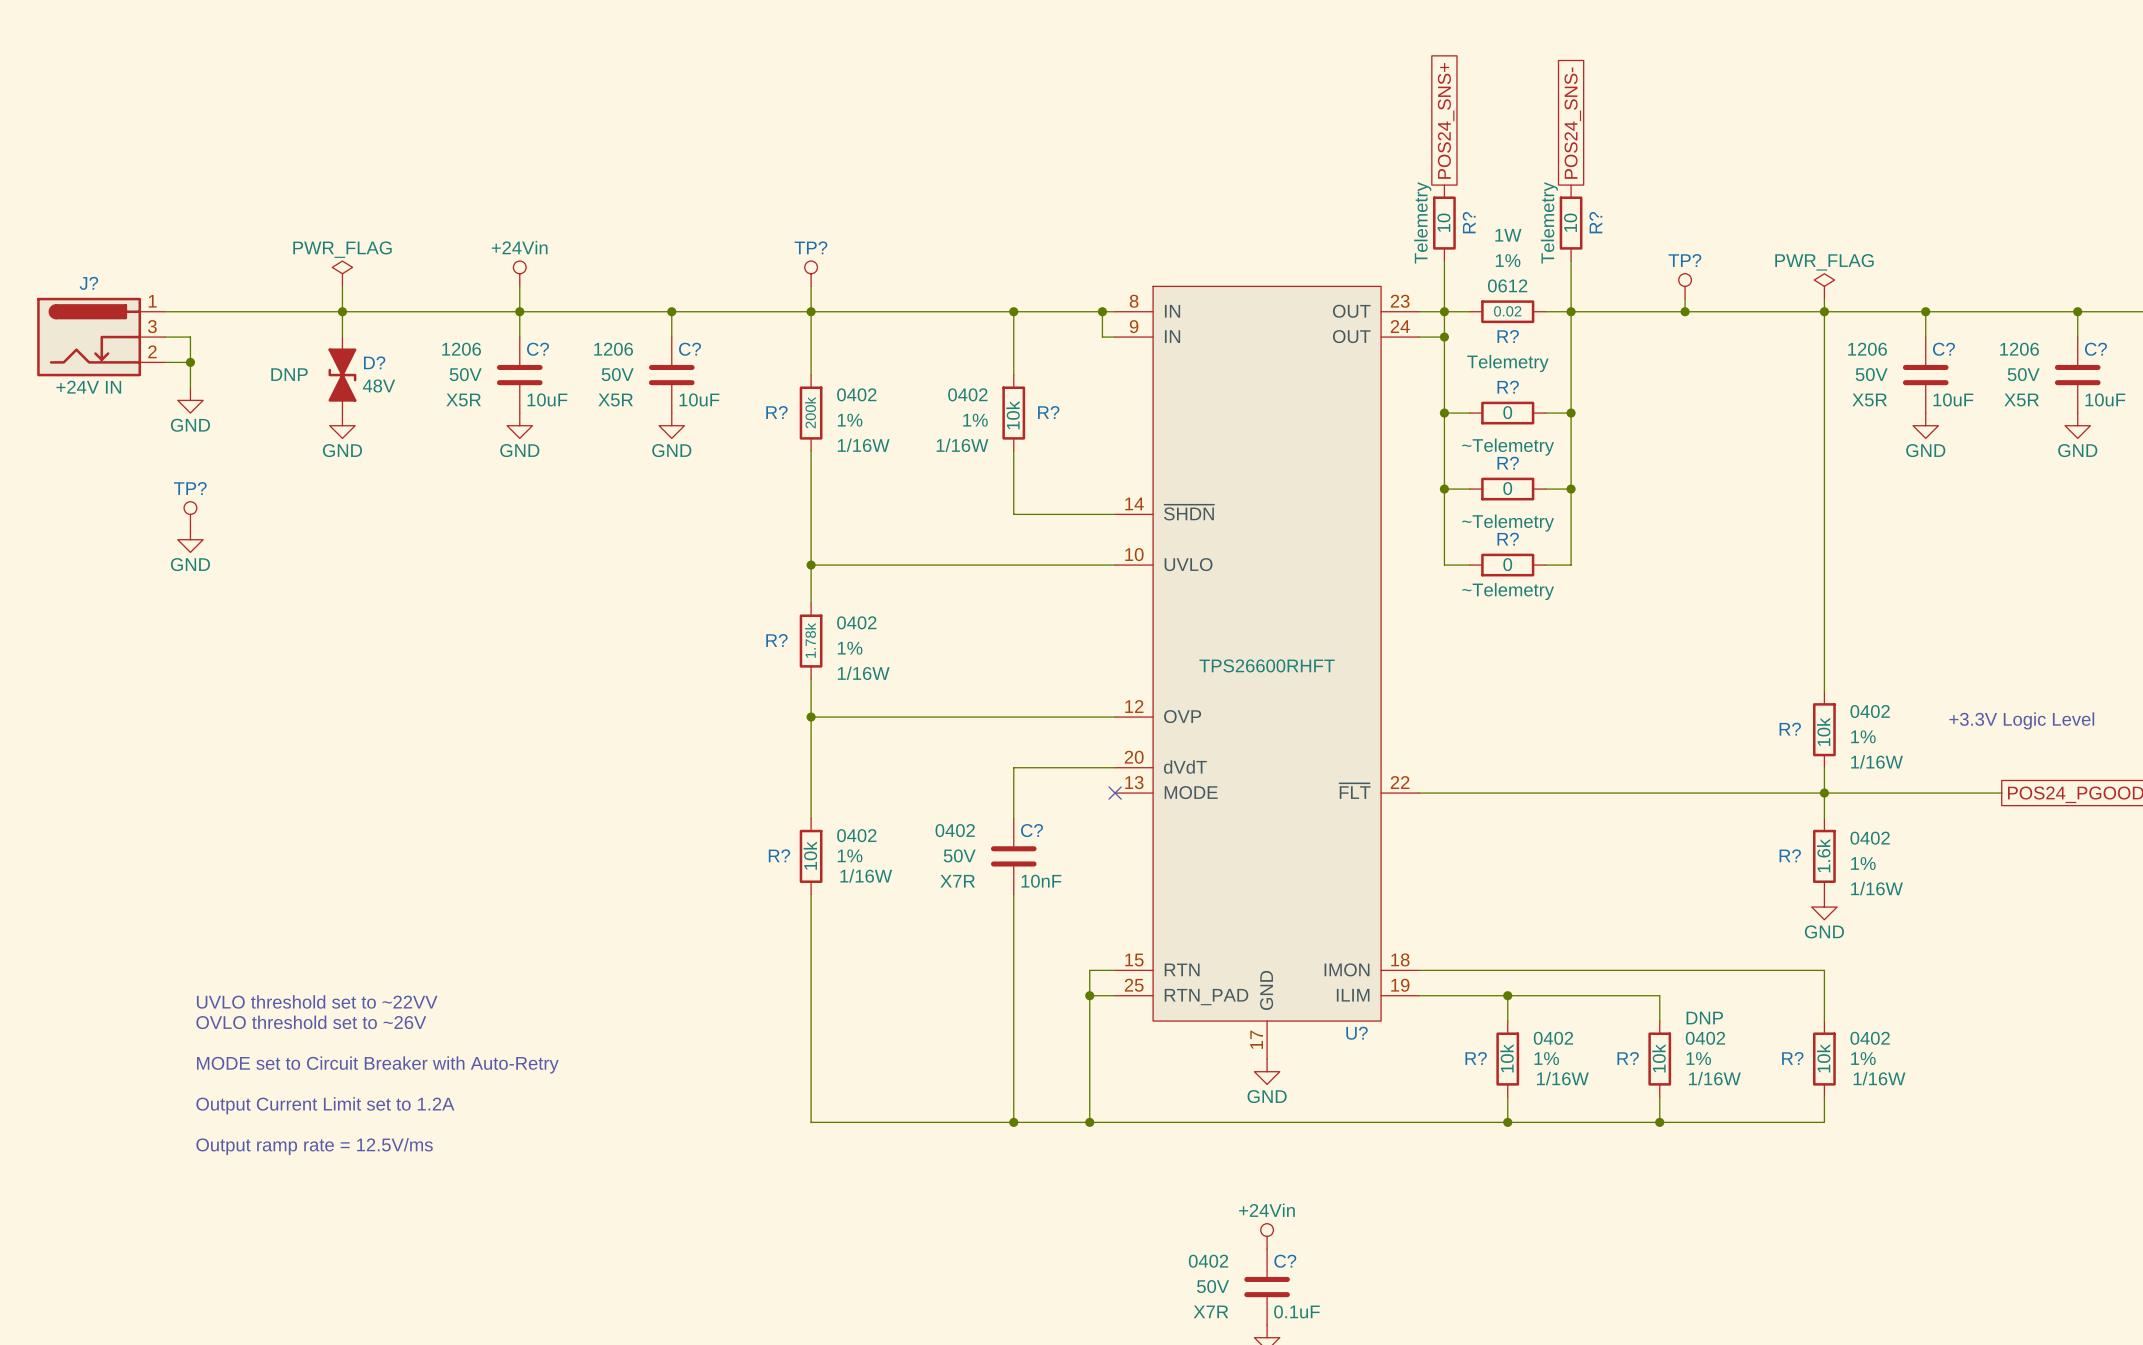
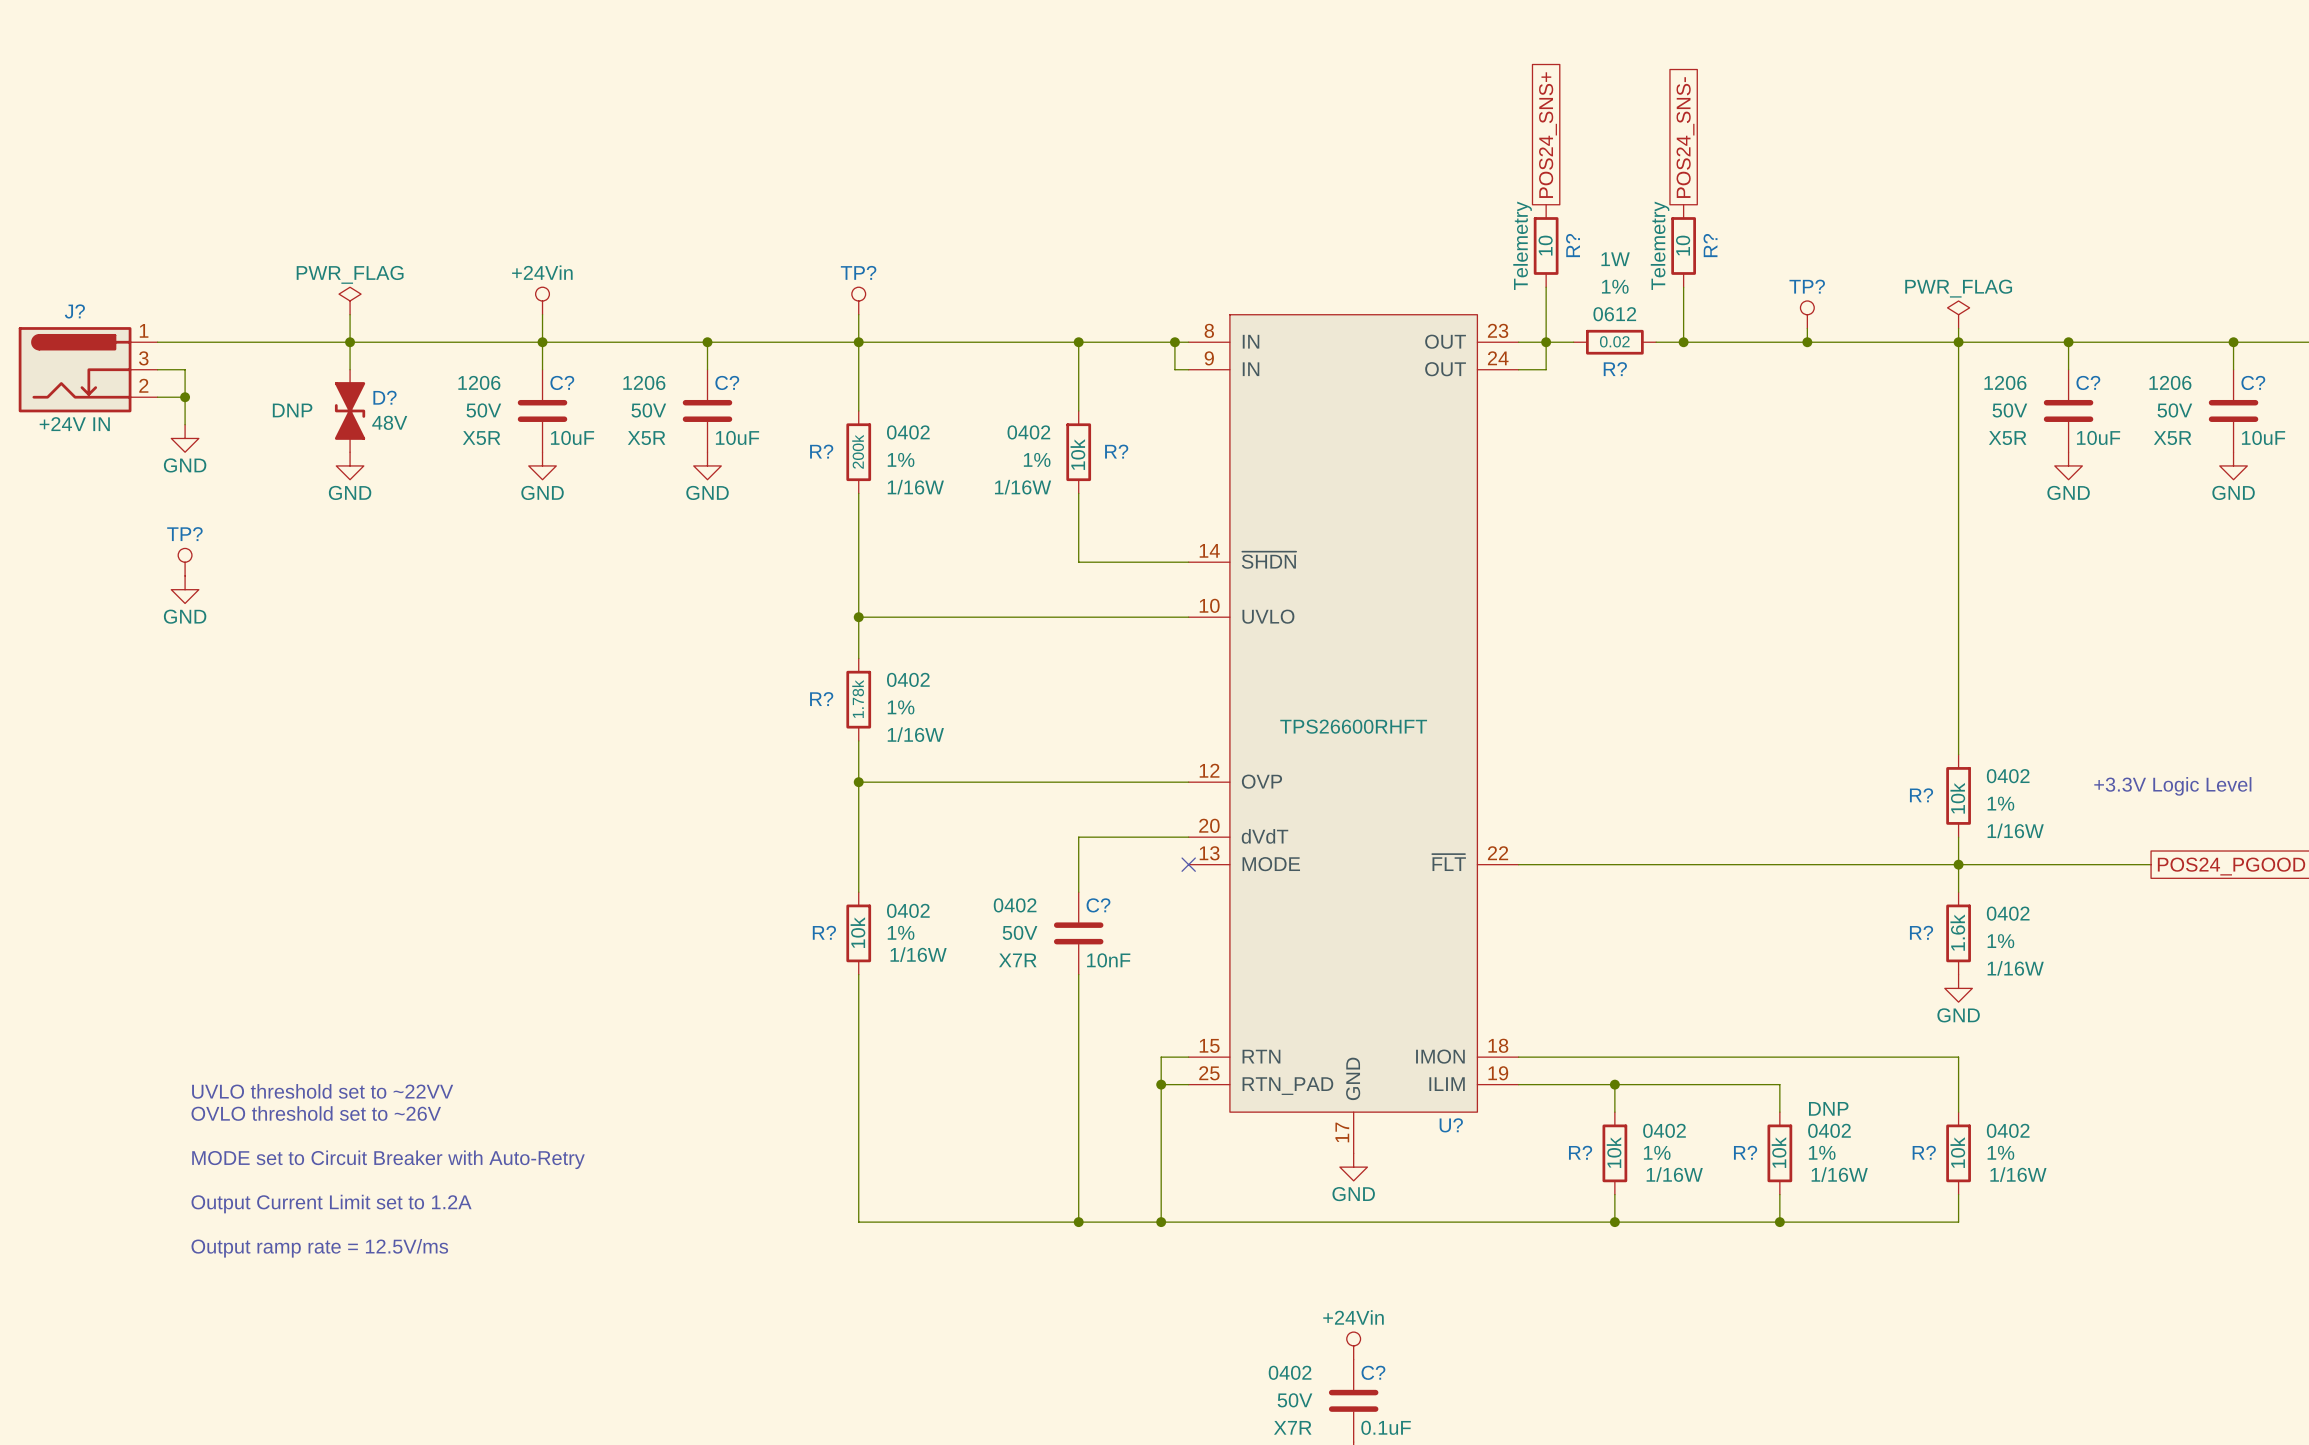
wire: (1571, 311) (1571, 565) (1545, 565) -> none
wire: (1444, 337) (1444, 565) (1469, 565) -> none
junction: (1444, 337) -> none
R? text: Telemetry (1507, 363) -> none
wire: (1444, 413) (1469, 413) -> none
junction: (1444, 413) -> none
R?: 0 (1507, 413) -> none
wire: (1545, 413) (1571, 413) -> none
junction: (1571, 413) -> none
wire: (1444, 489) (1469, 489) -> none
junction: (1444, 489) -> none
R?: 0 (1507, 489) -> none
wire: (1545, 489) (1571, 489) -> none
junction: (1571, 489) -> none
R?: 0 (1507, 565) -> none

